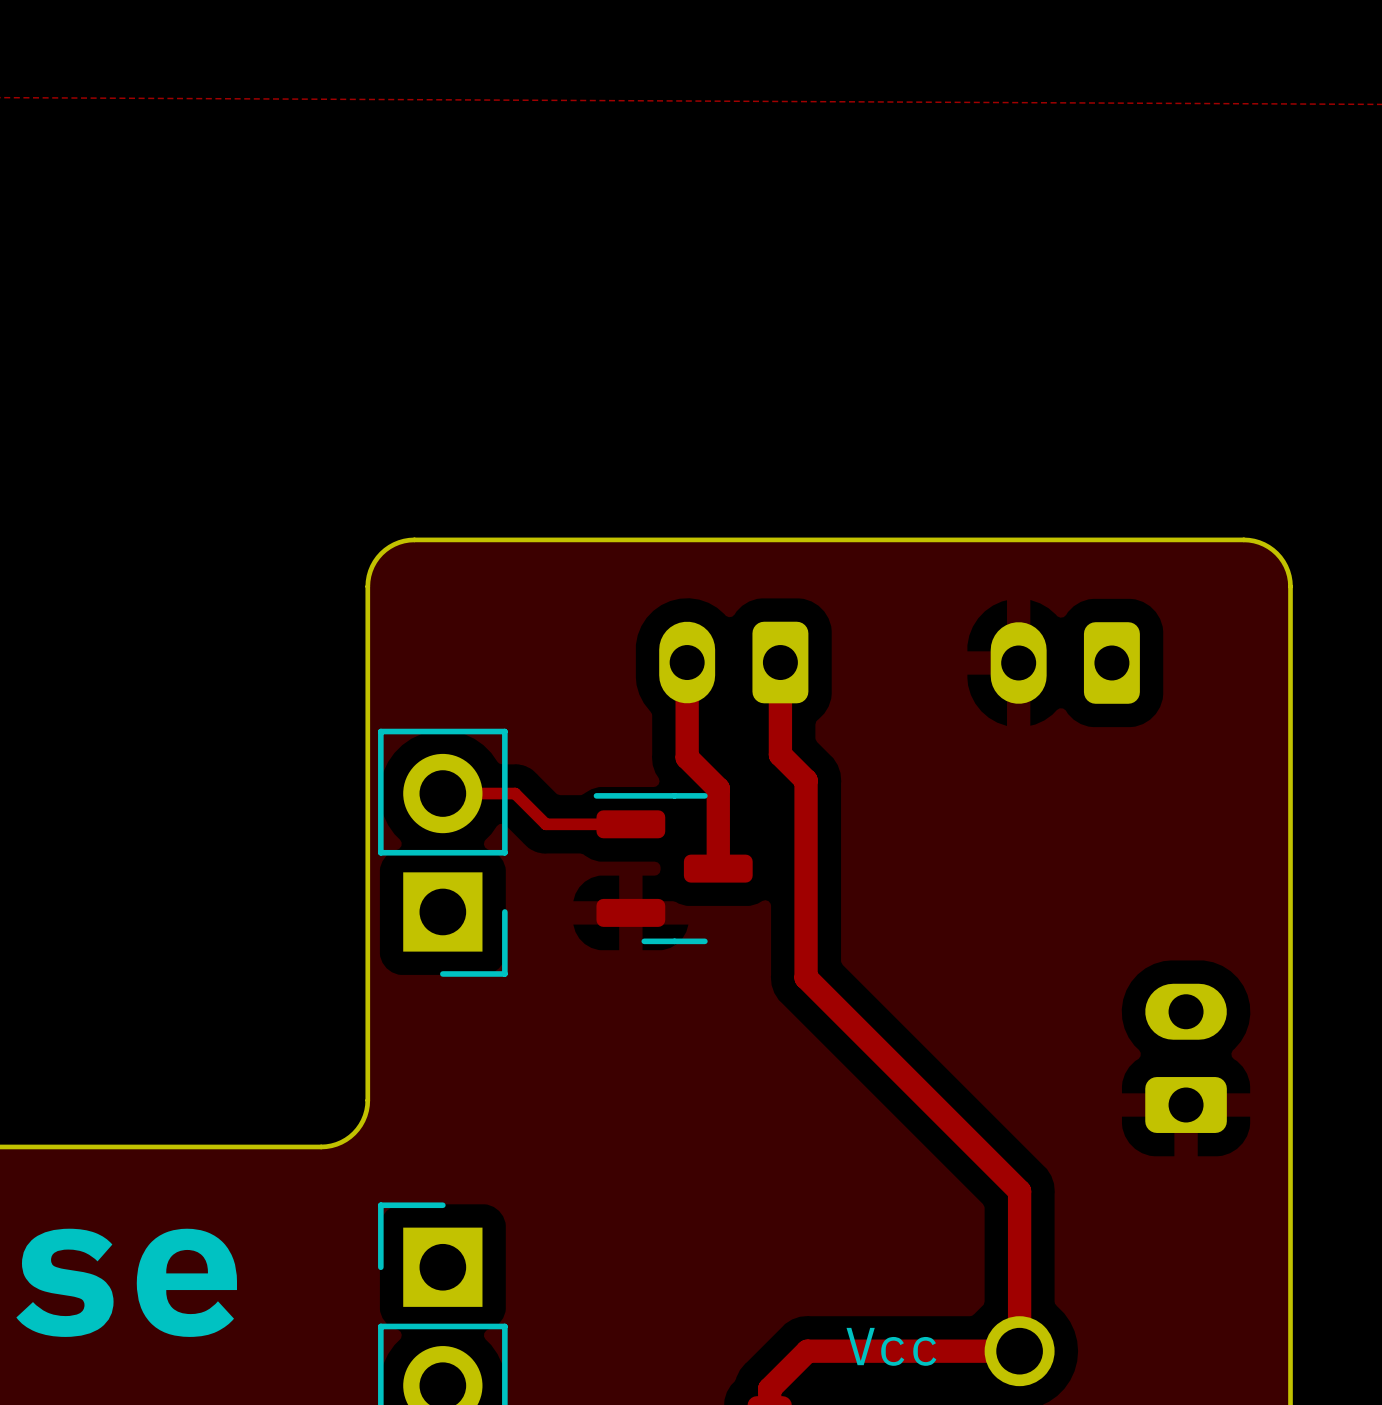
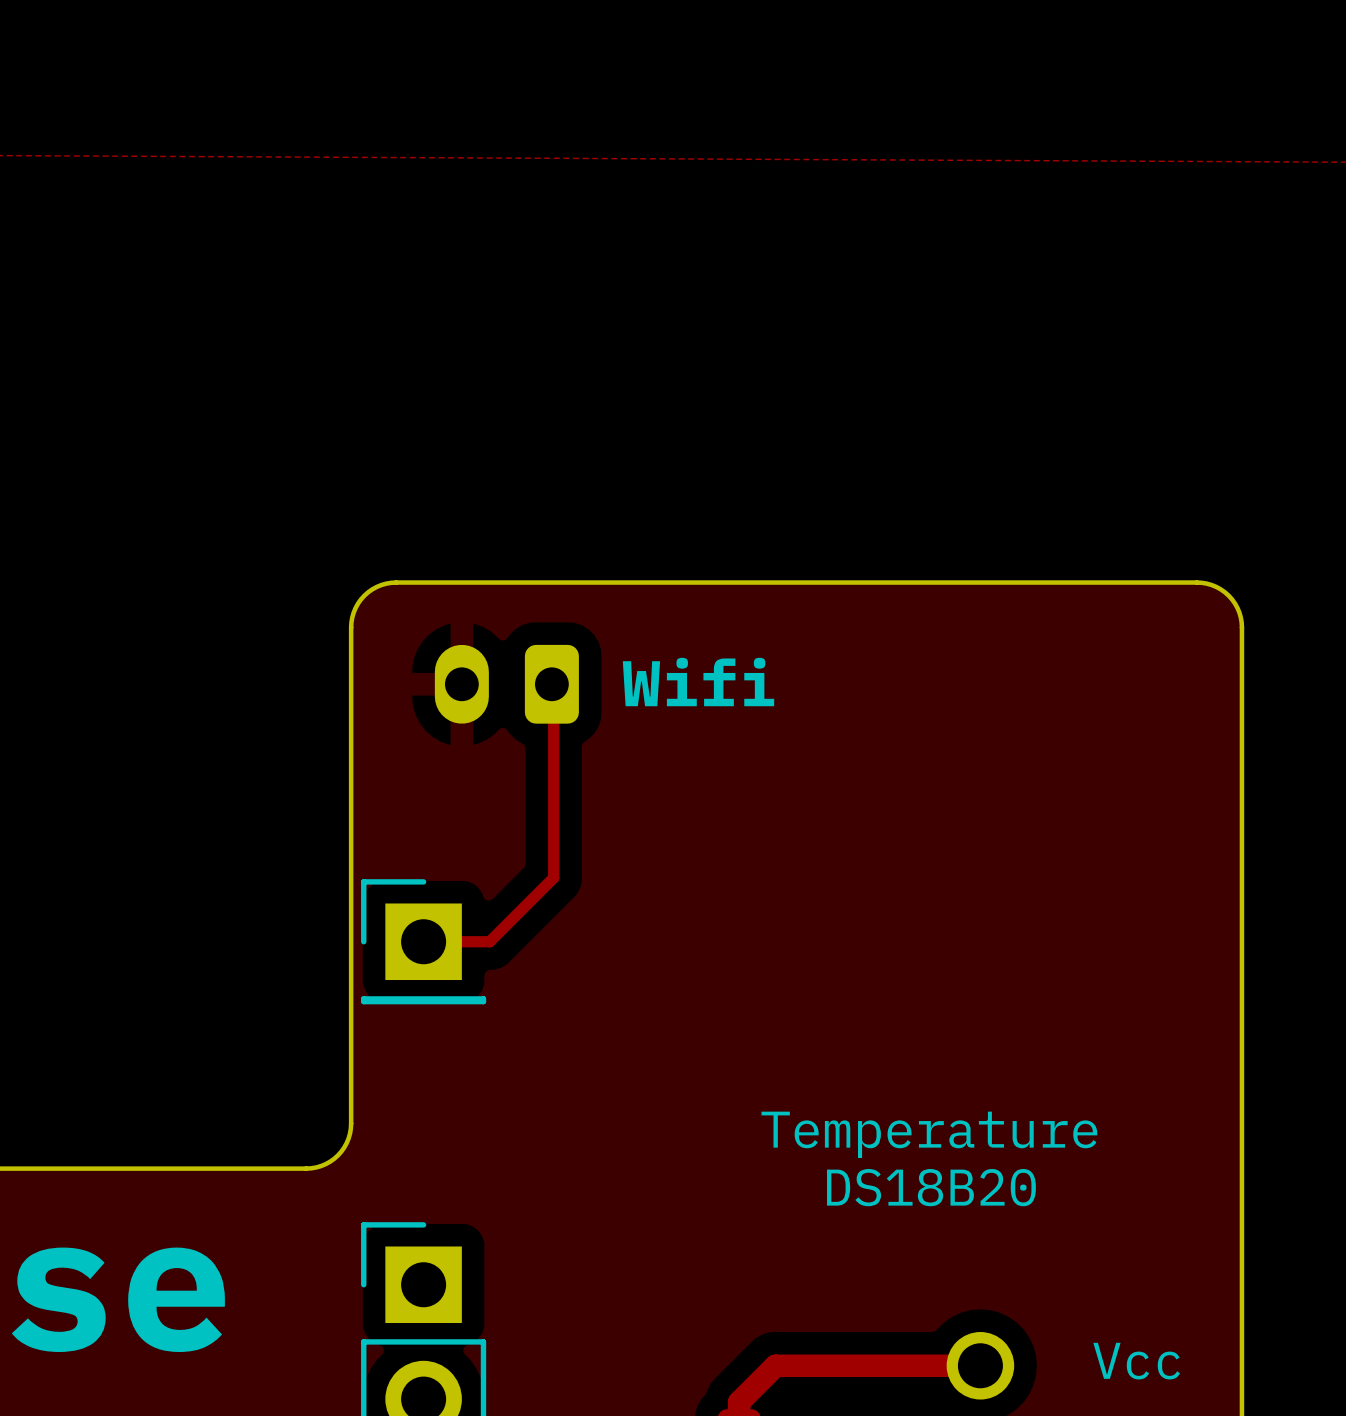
text: none -> Wifi (698, 682)
track: none -> (553, 685) (553, 877) (489, 941) (423, 941)
track: (687, 662) (687, 757) (718, 788) (718, 868) -> none
part position: (733, 662) -> (506, 684)
track: (780, 662) (780, 754) (806, 780) (806, 977) (1019, 1191) (1019, 1351) -> none
part: (1065, 662) -> none
track: (442, 793) (515, 793) (545, 824) (630, 824) -> none
part: (442, 852) -> none
part: (673, 868) -> none
part: none -> (423, 941)
part: (1186, 1058) -> none
text: none -> Temperature (929, 1134)
text: none -> DS18B20 (931, 1187)
text position: Vcc (891, 1346) -> Vcc (1136, 1361)

